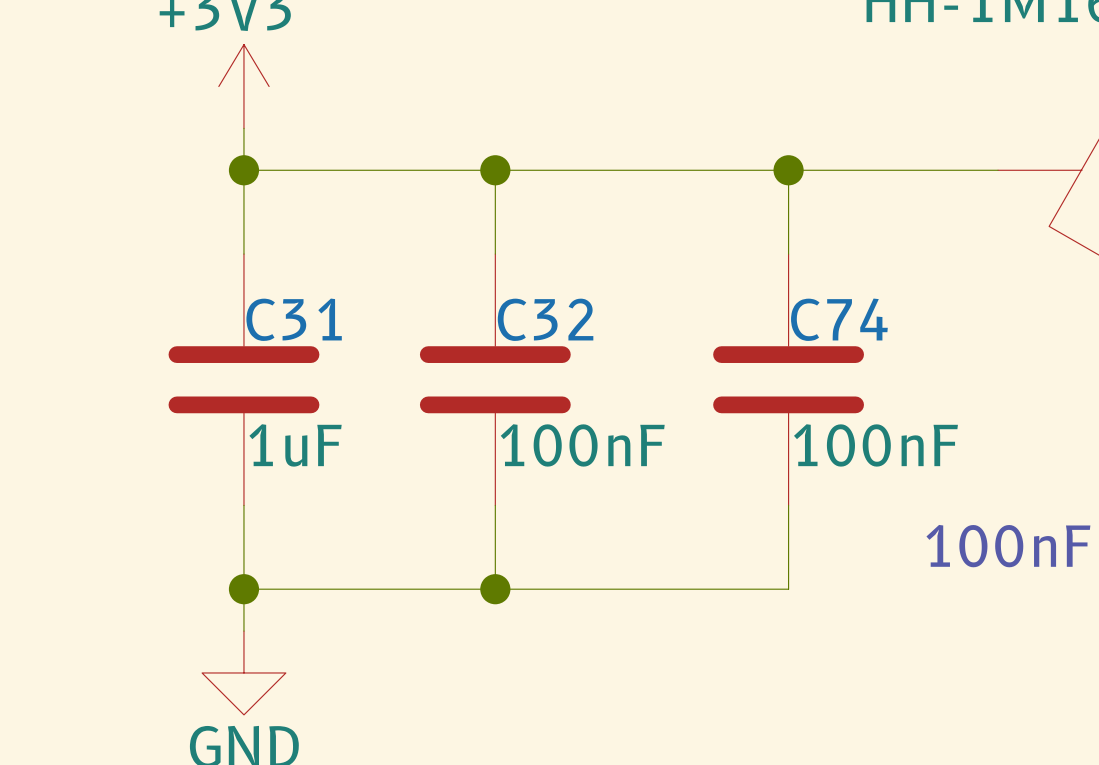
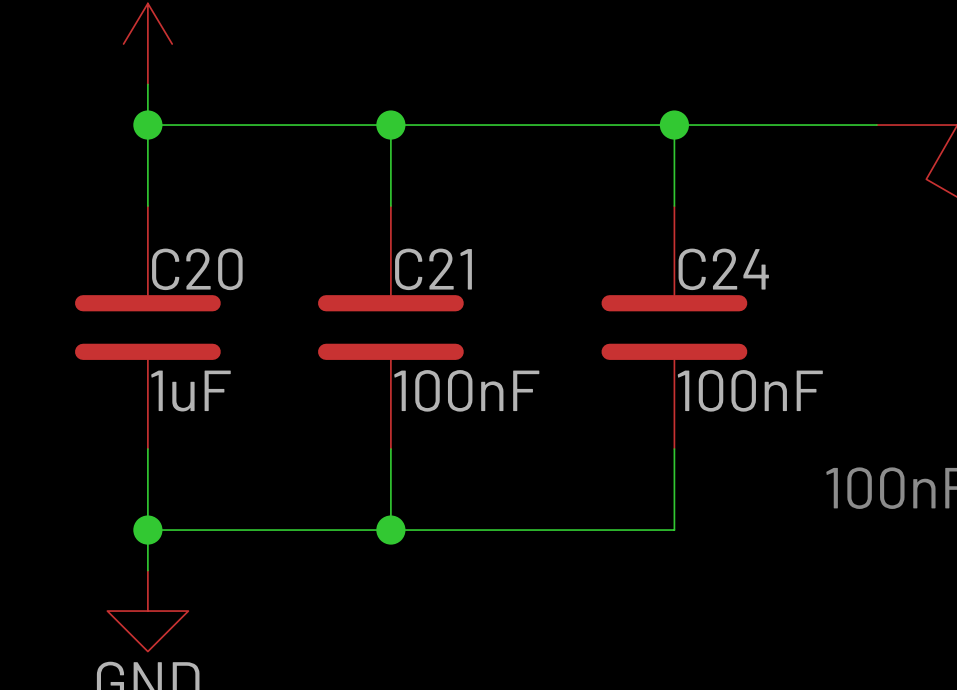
C31 name: C31 (294, 319) -> C20 (197, 269)
C32 name: C32 (545, 319) -> C21 (433, 269)
C74 name: C74 (839, 319) -> C24 (723, 269)

